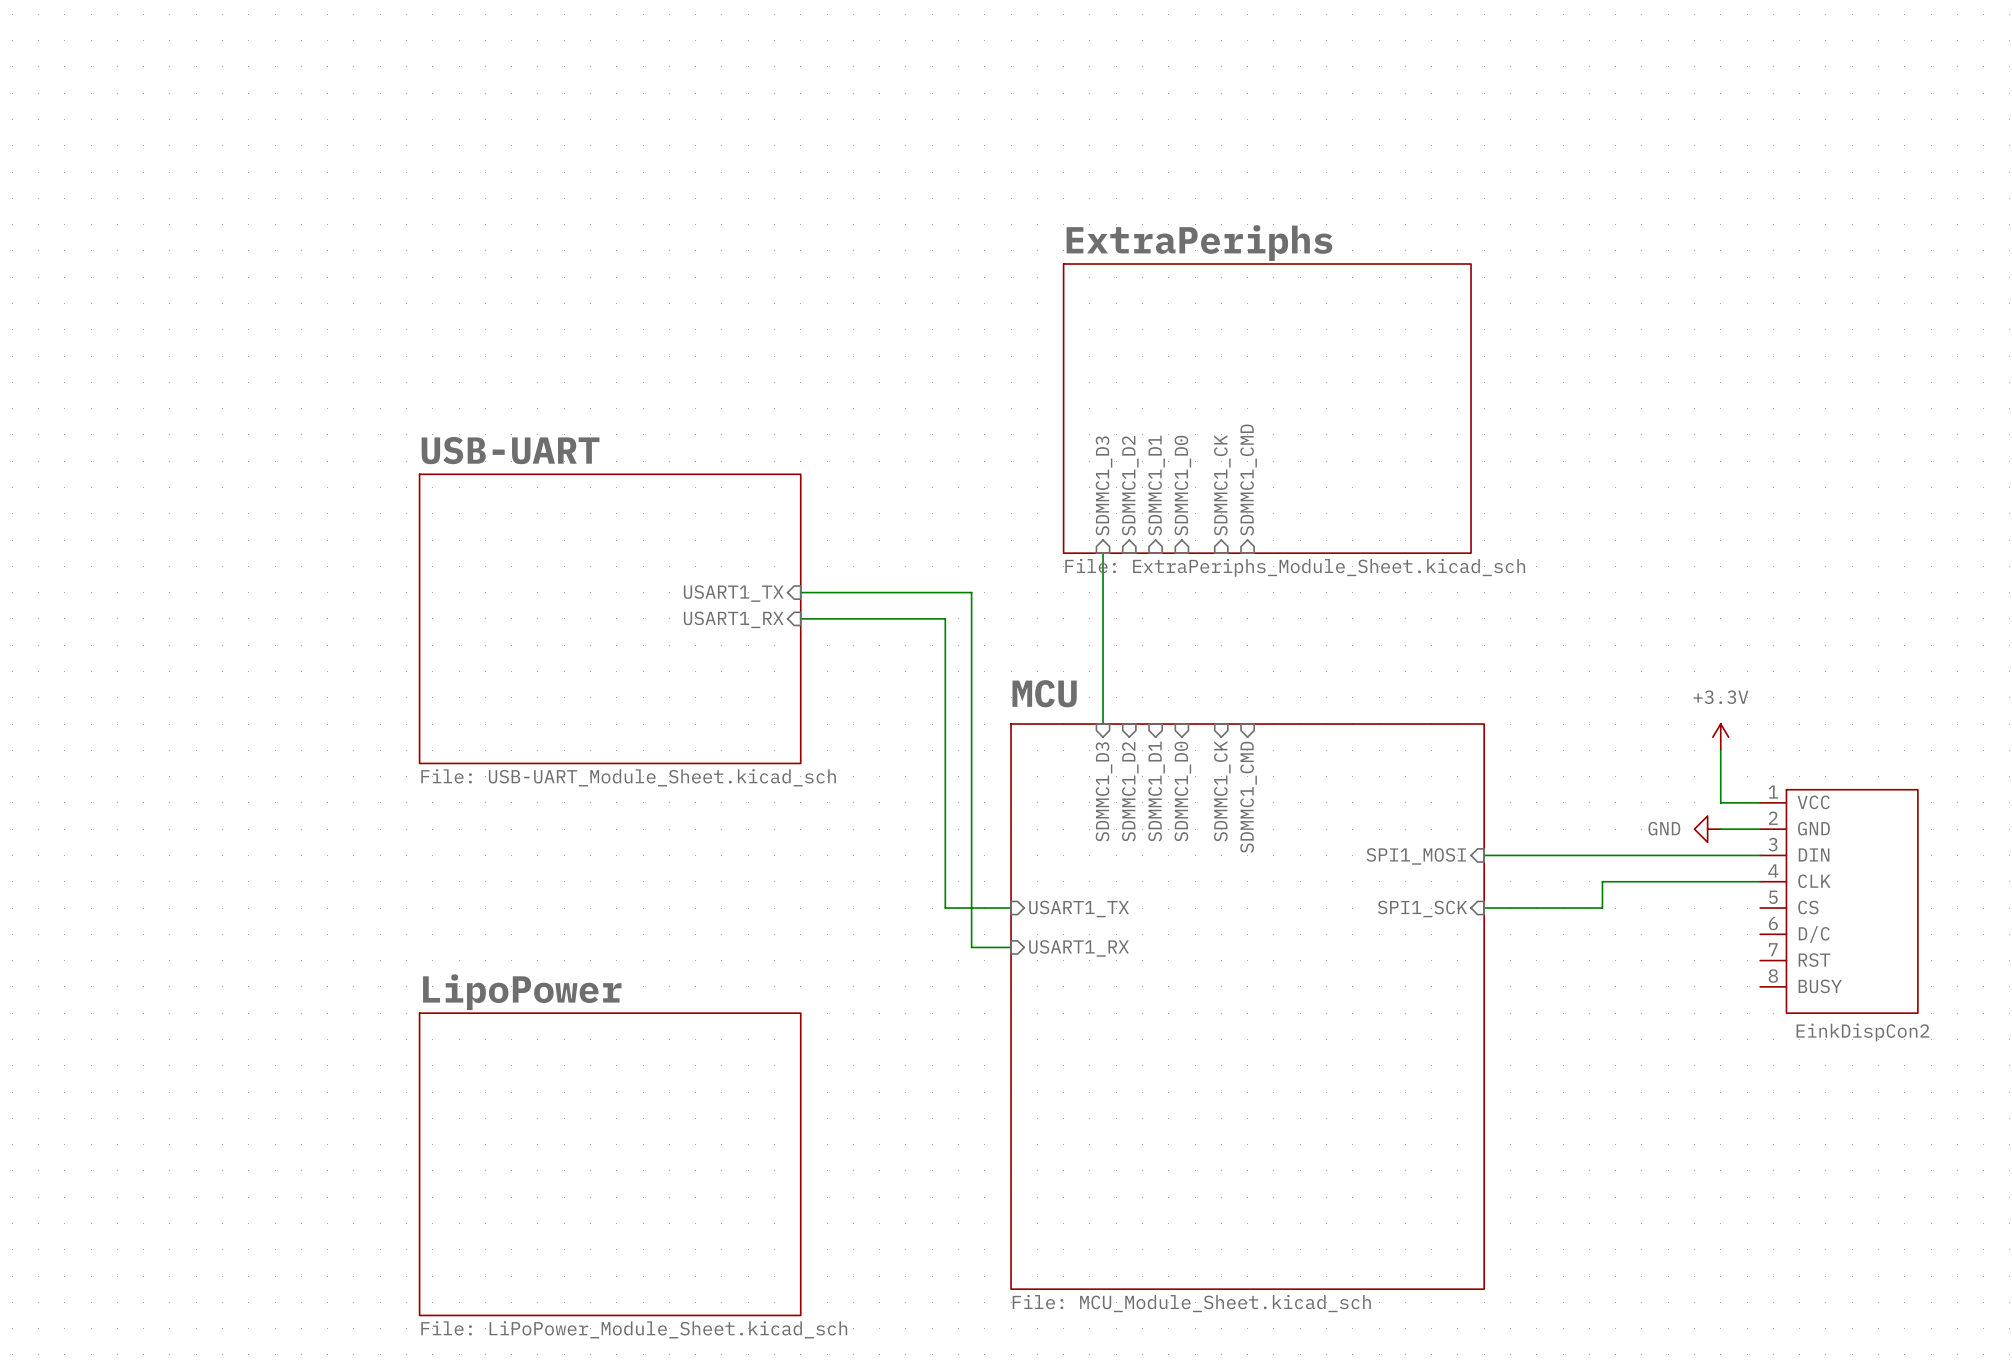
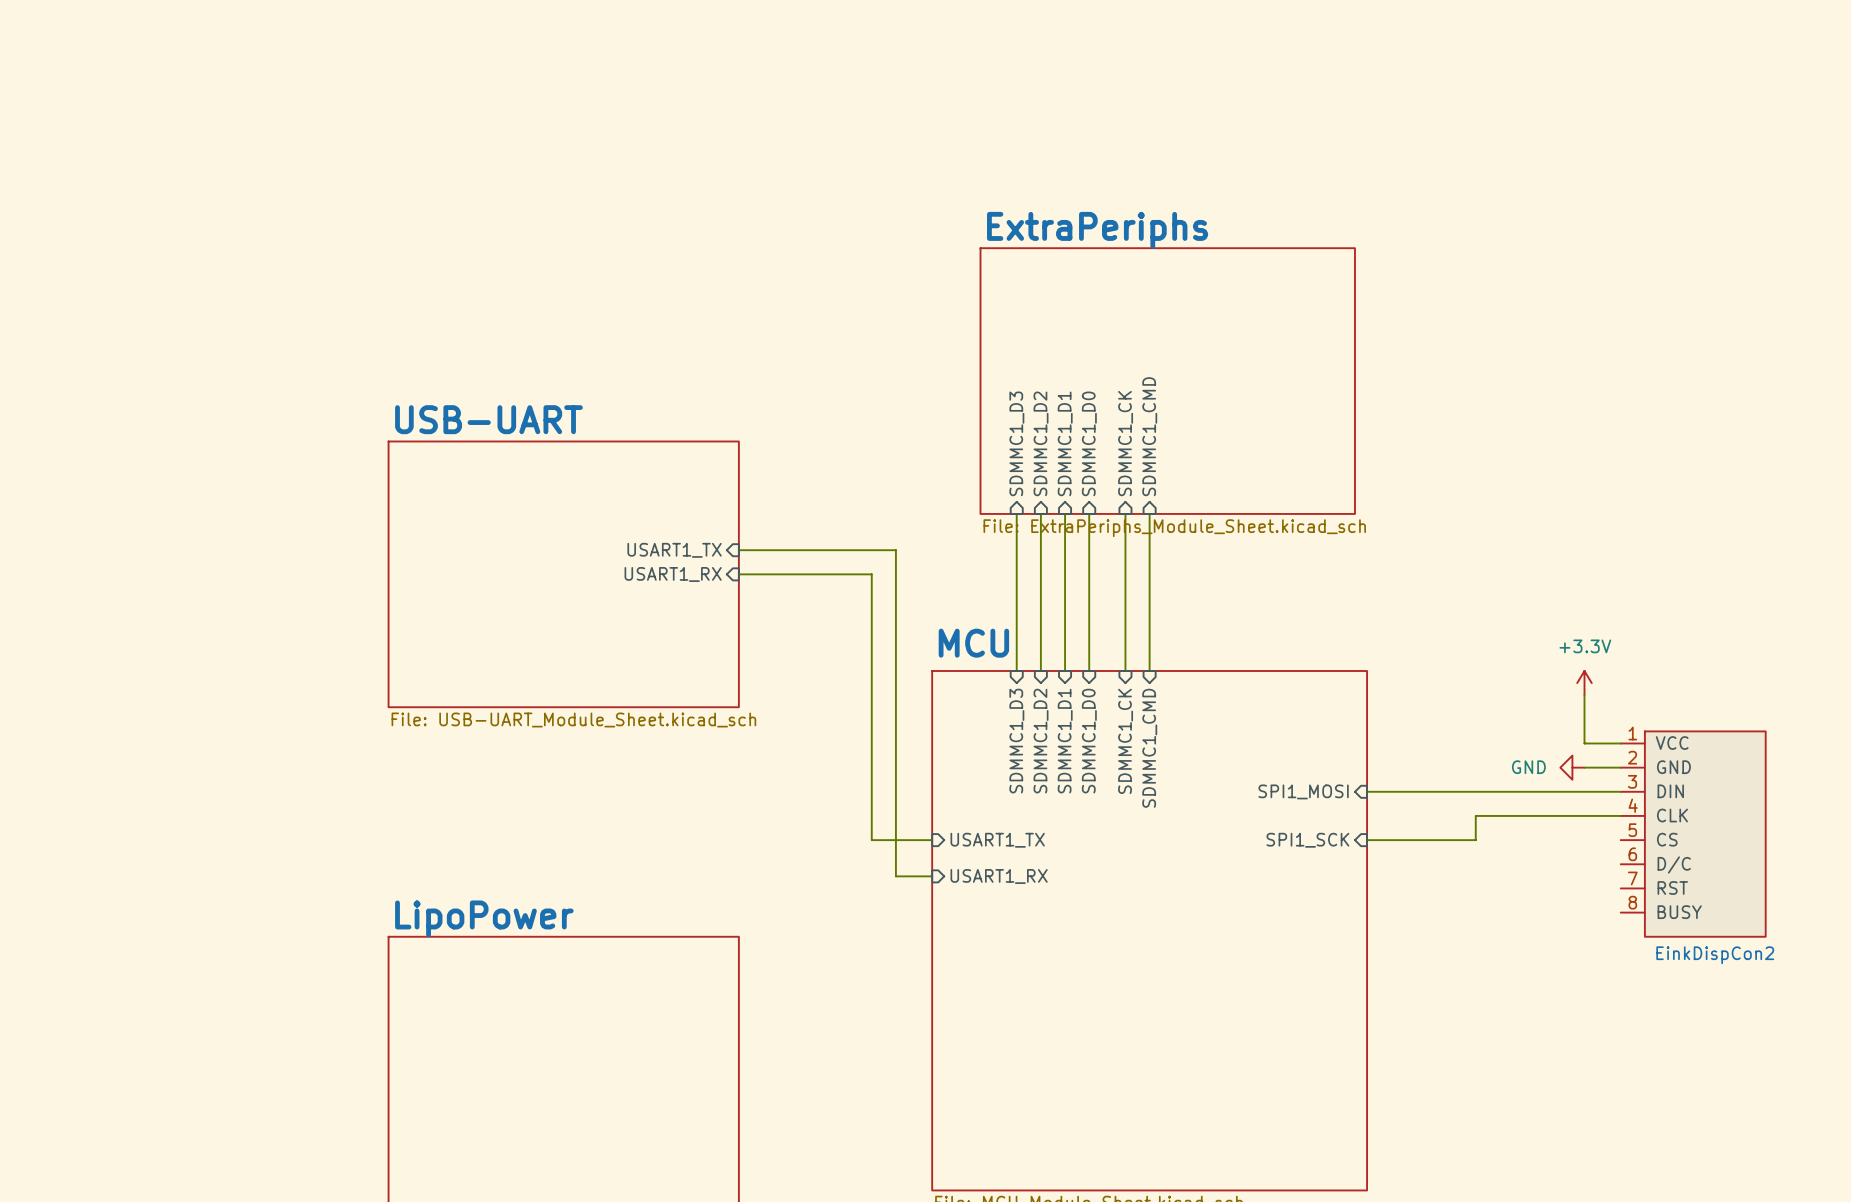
wire: none -> (1040, 513) (1040, 671)
wire: none -> (1065, 513) (1065, 671)
wire: none -> (1089, 513) (1089, 671)
wire: none -> (1125, 513) (1125, 671)
wire: none -> (1149, 513) (1149, 671)

